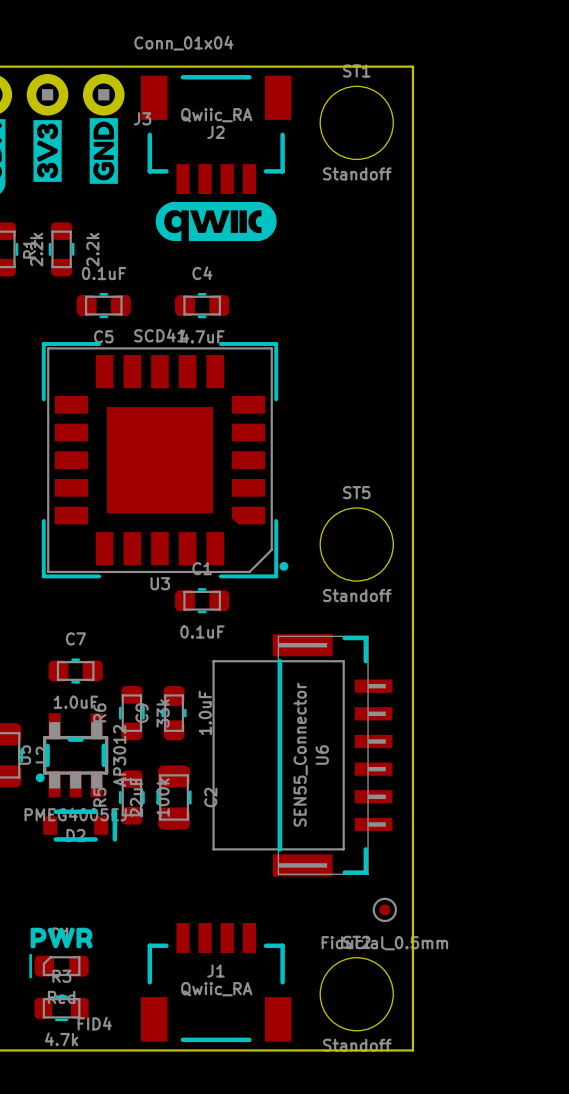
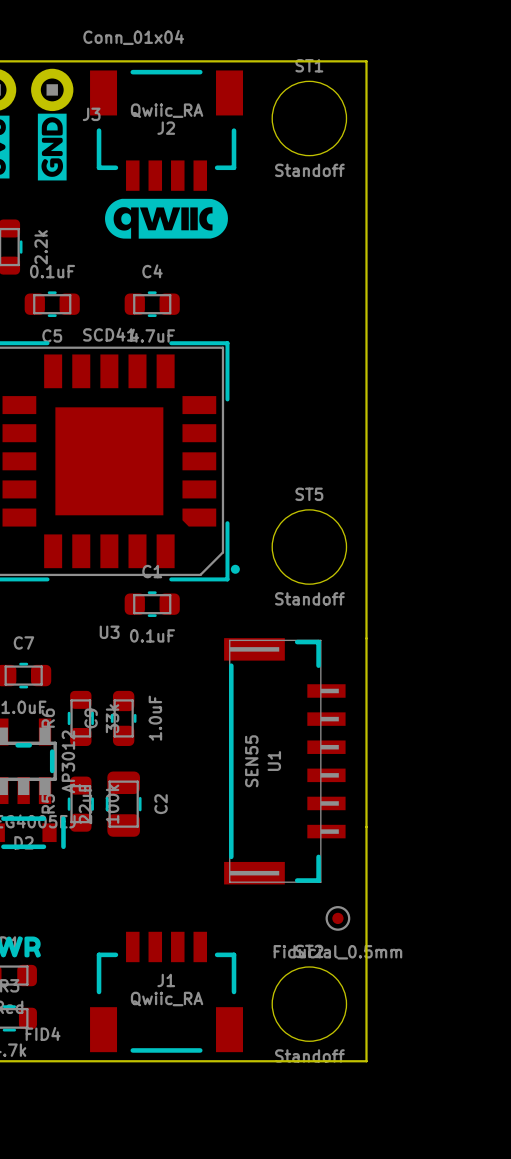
U3 name position: U3 (160, 583) -> U3 (109, 632)
U6: SEN55_Connector (302, 755) -> none
U1: none -> SEN55 (284, 761)

